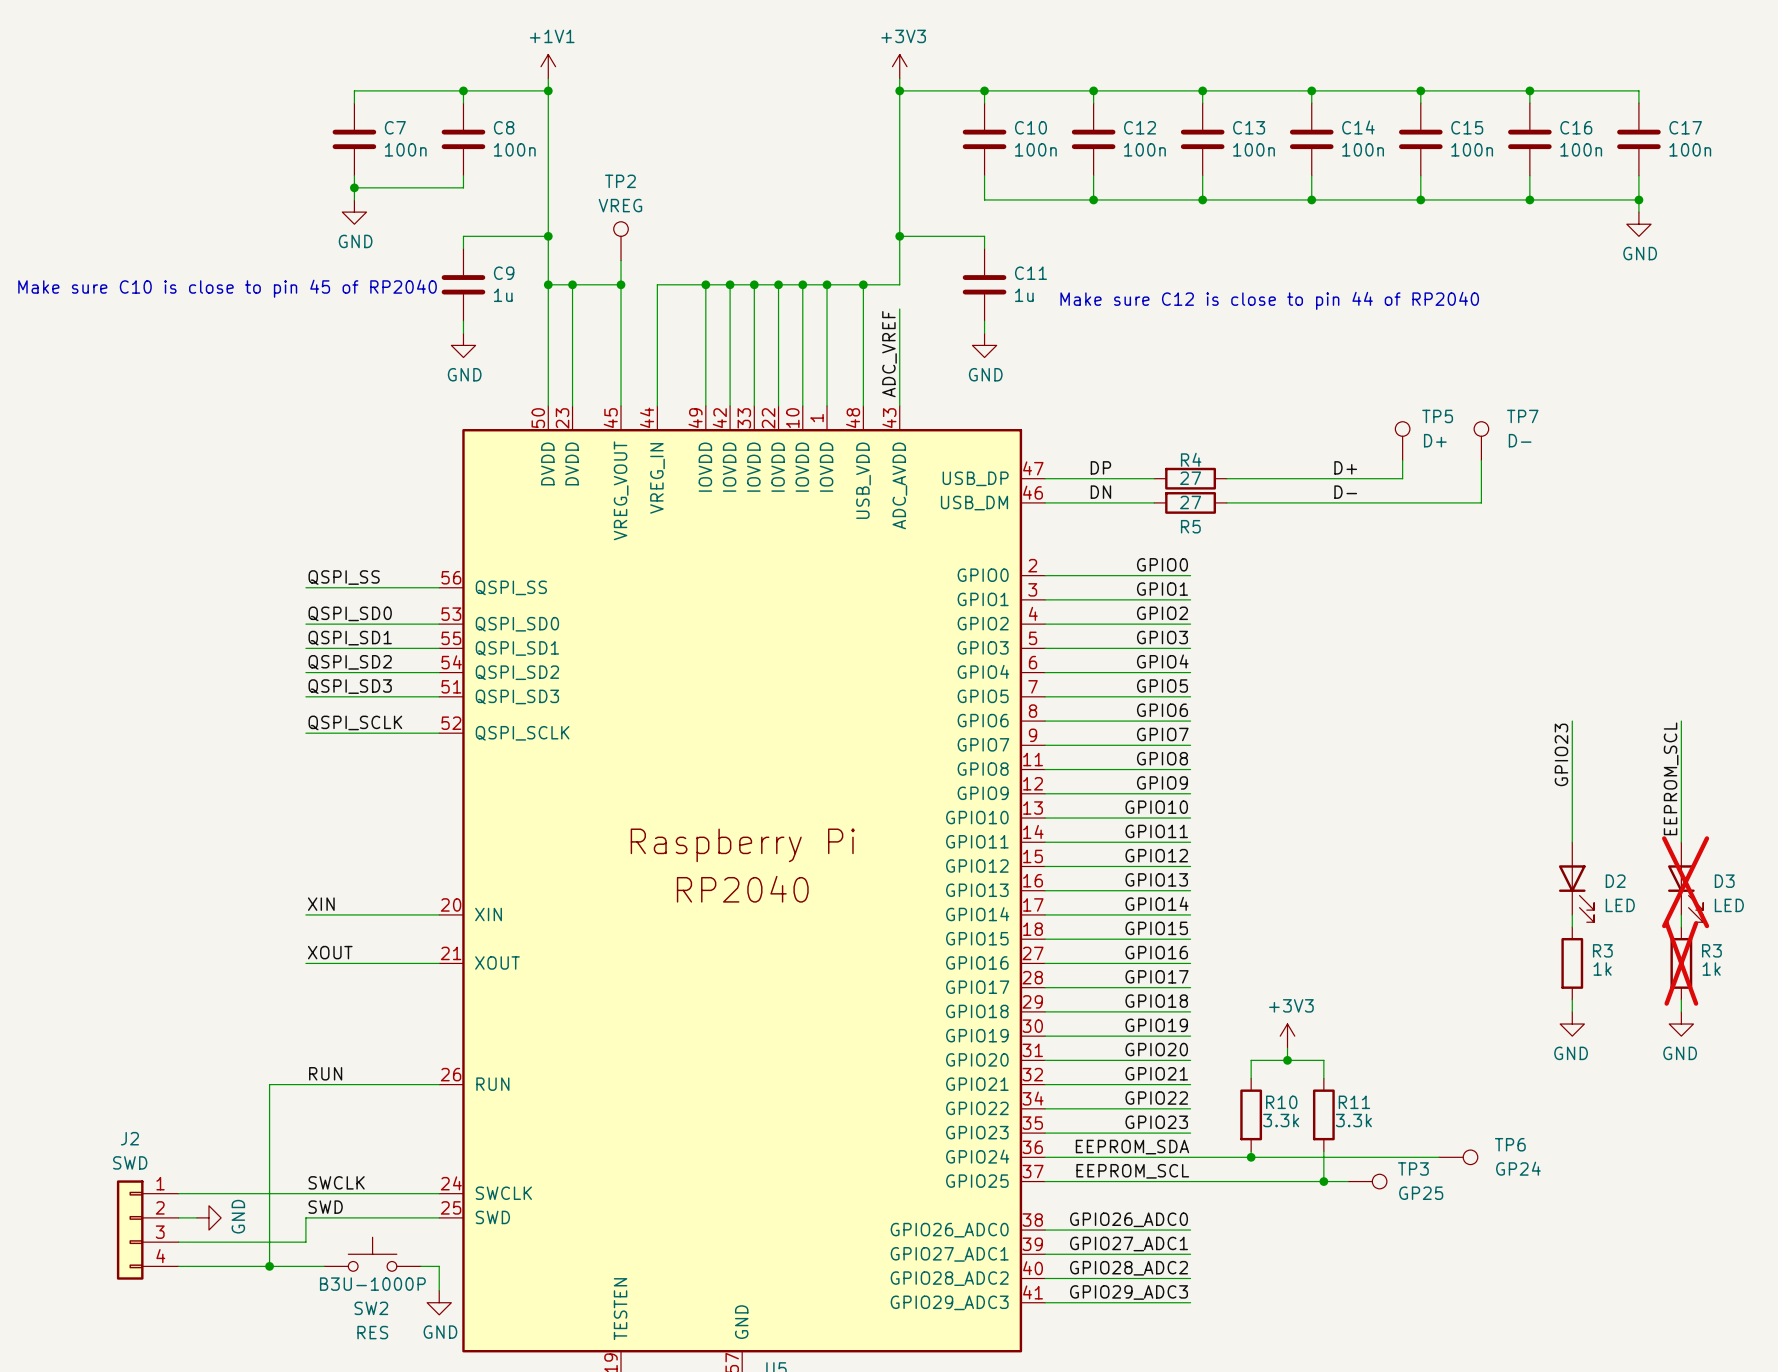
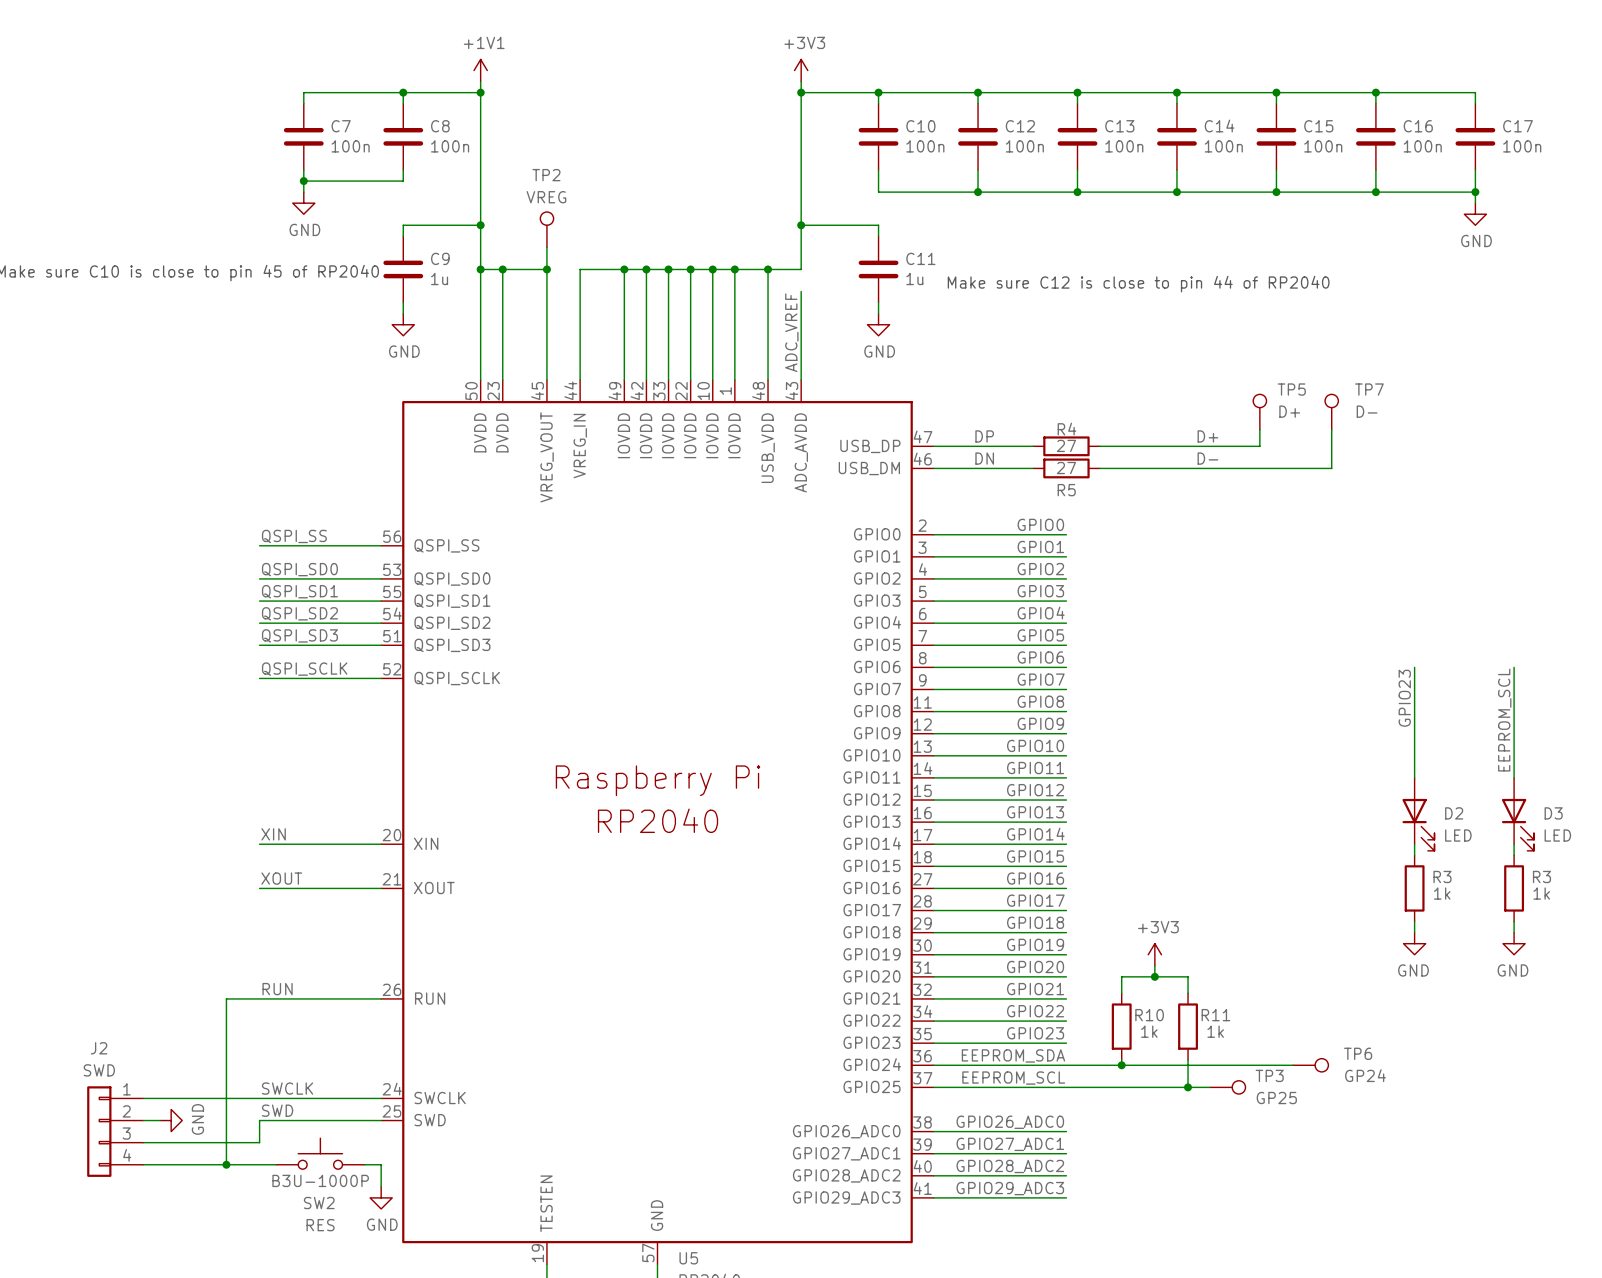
D3 do-not-place cross: (1685, 882) -> none
R3 do-not-place cross: (1681, 963) -> none
R10 value: 3.3k (1281, 1120) -> 1k (1149, 1031)
R11 value: 3.3k (1353, 1120) -> 1k (1215, 1031)

